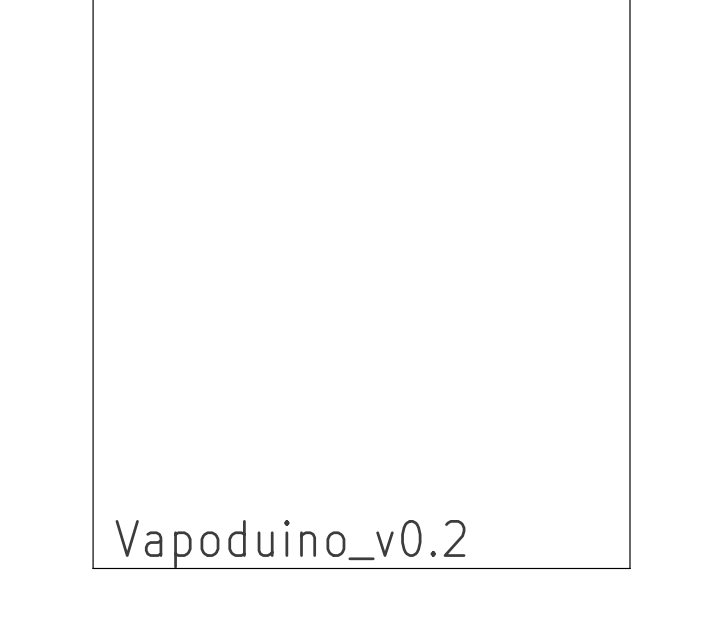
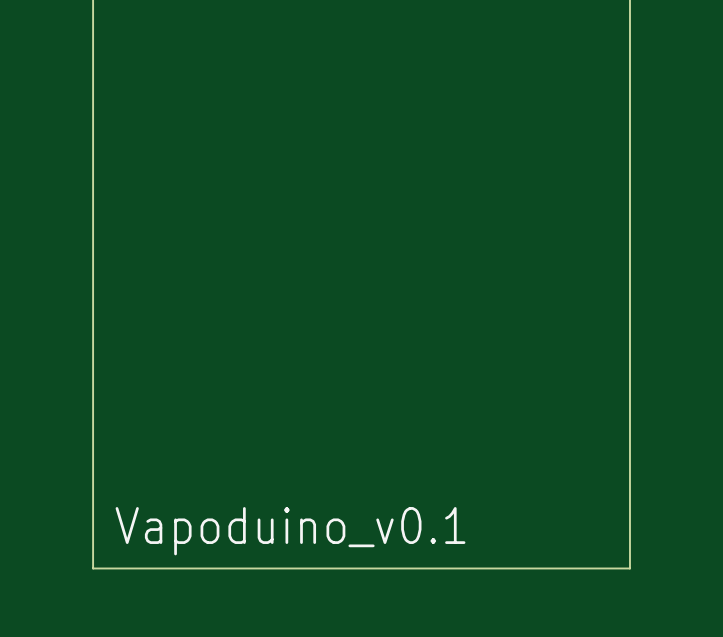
text: Vapoduino_v0.2 (290, 544) -> Vapoduino_v0.1 (290, 531)

